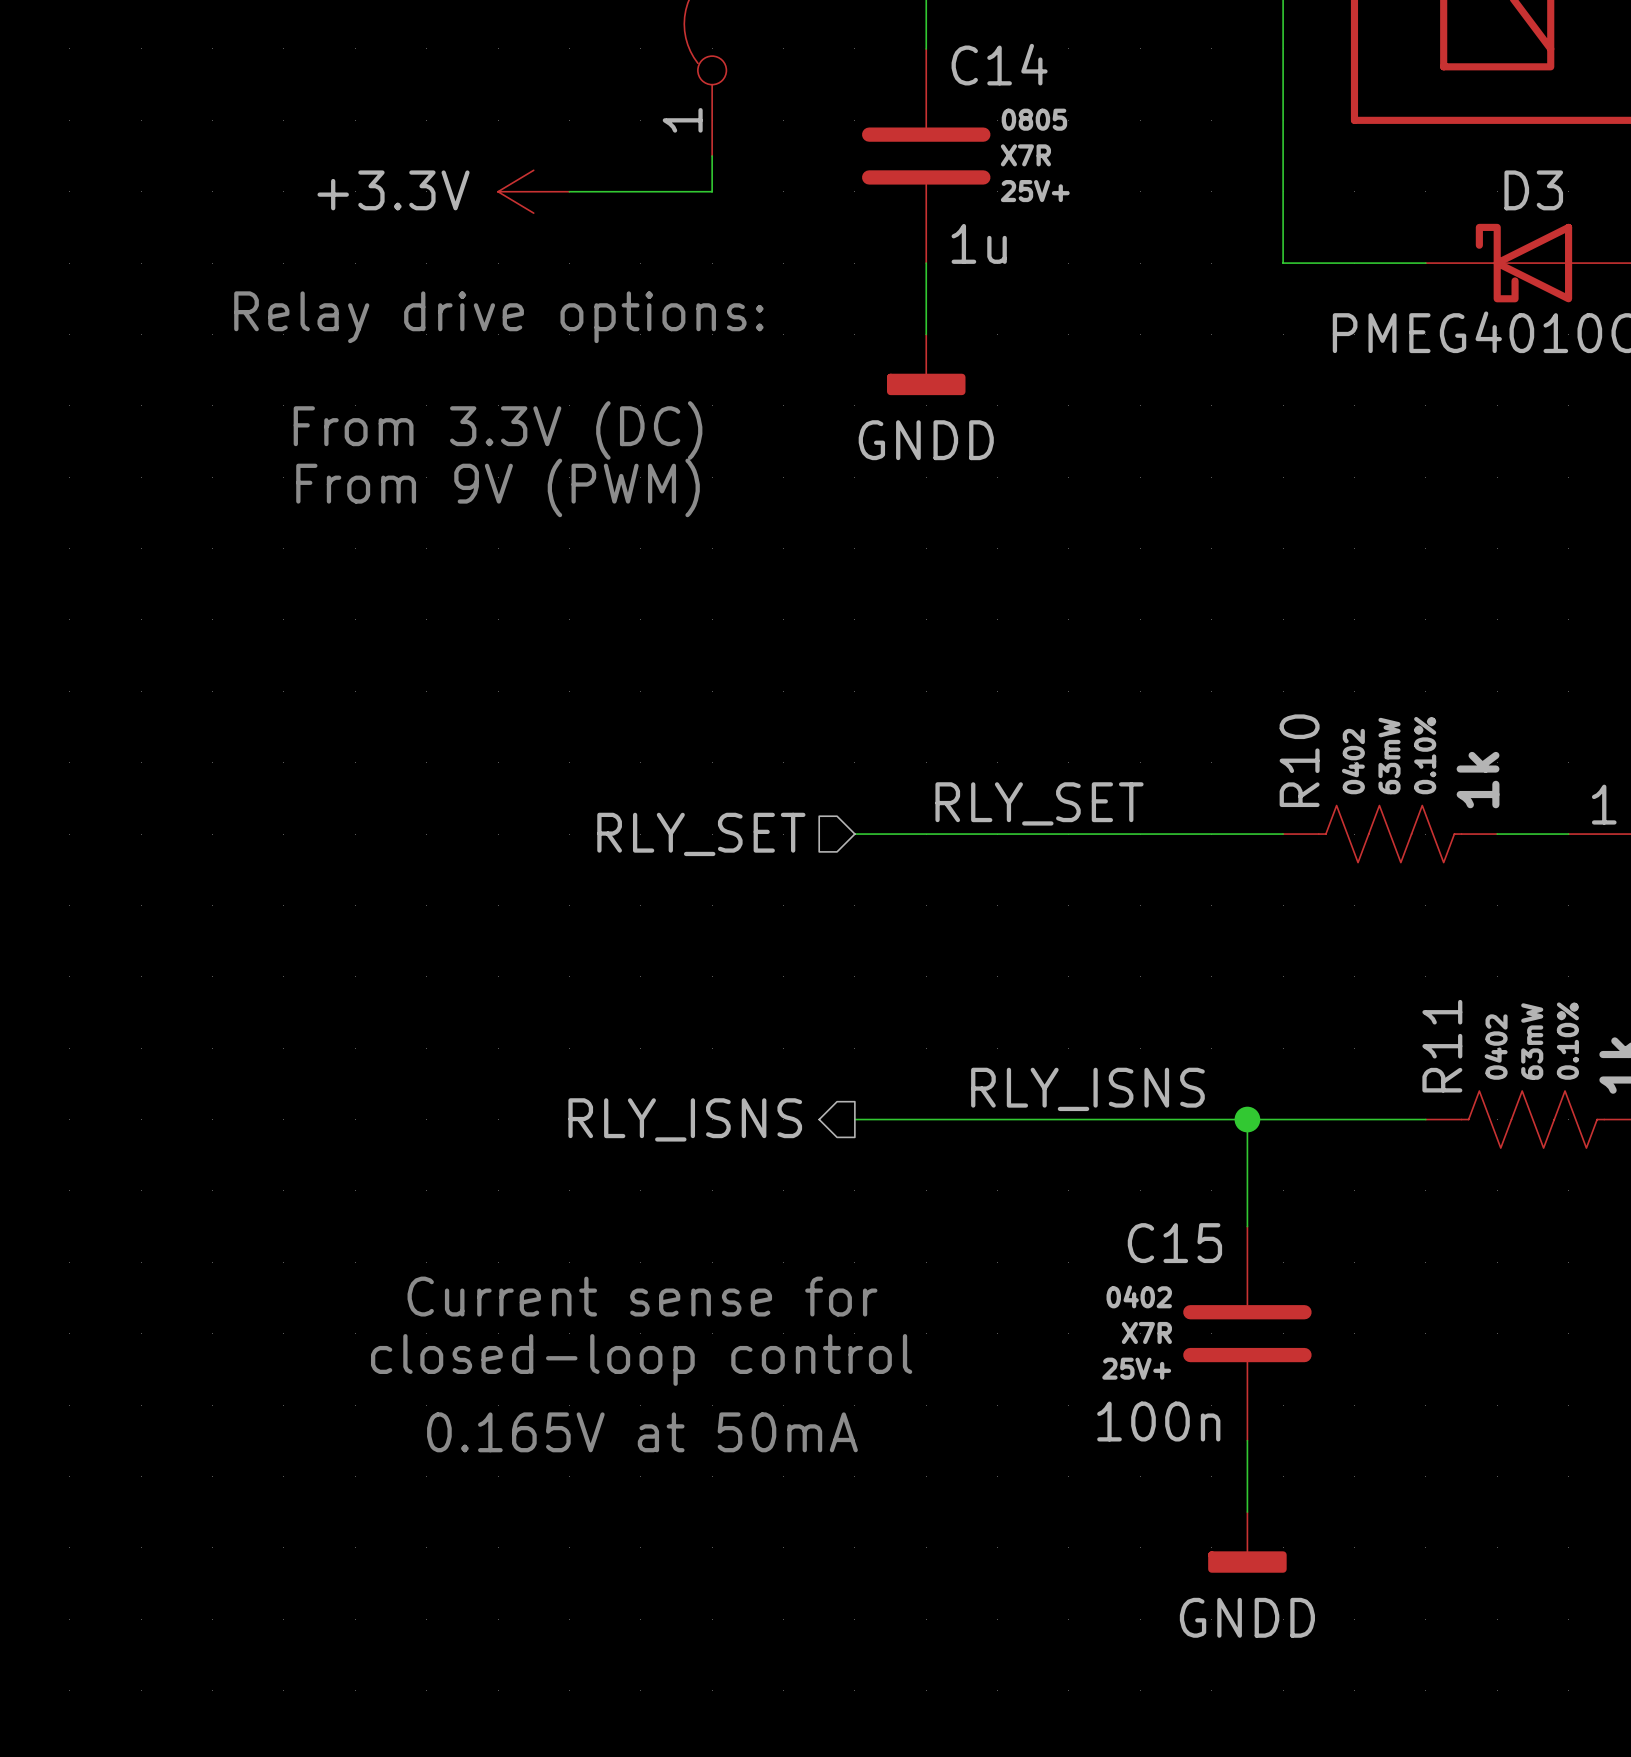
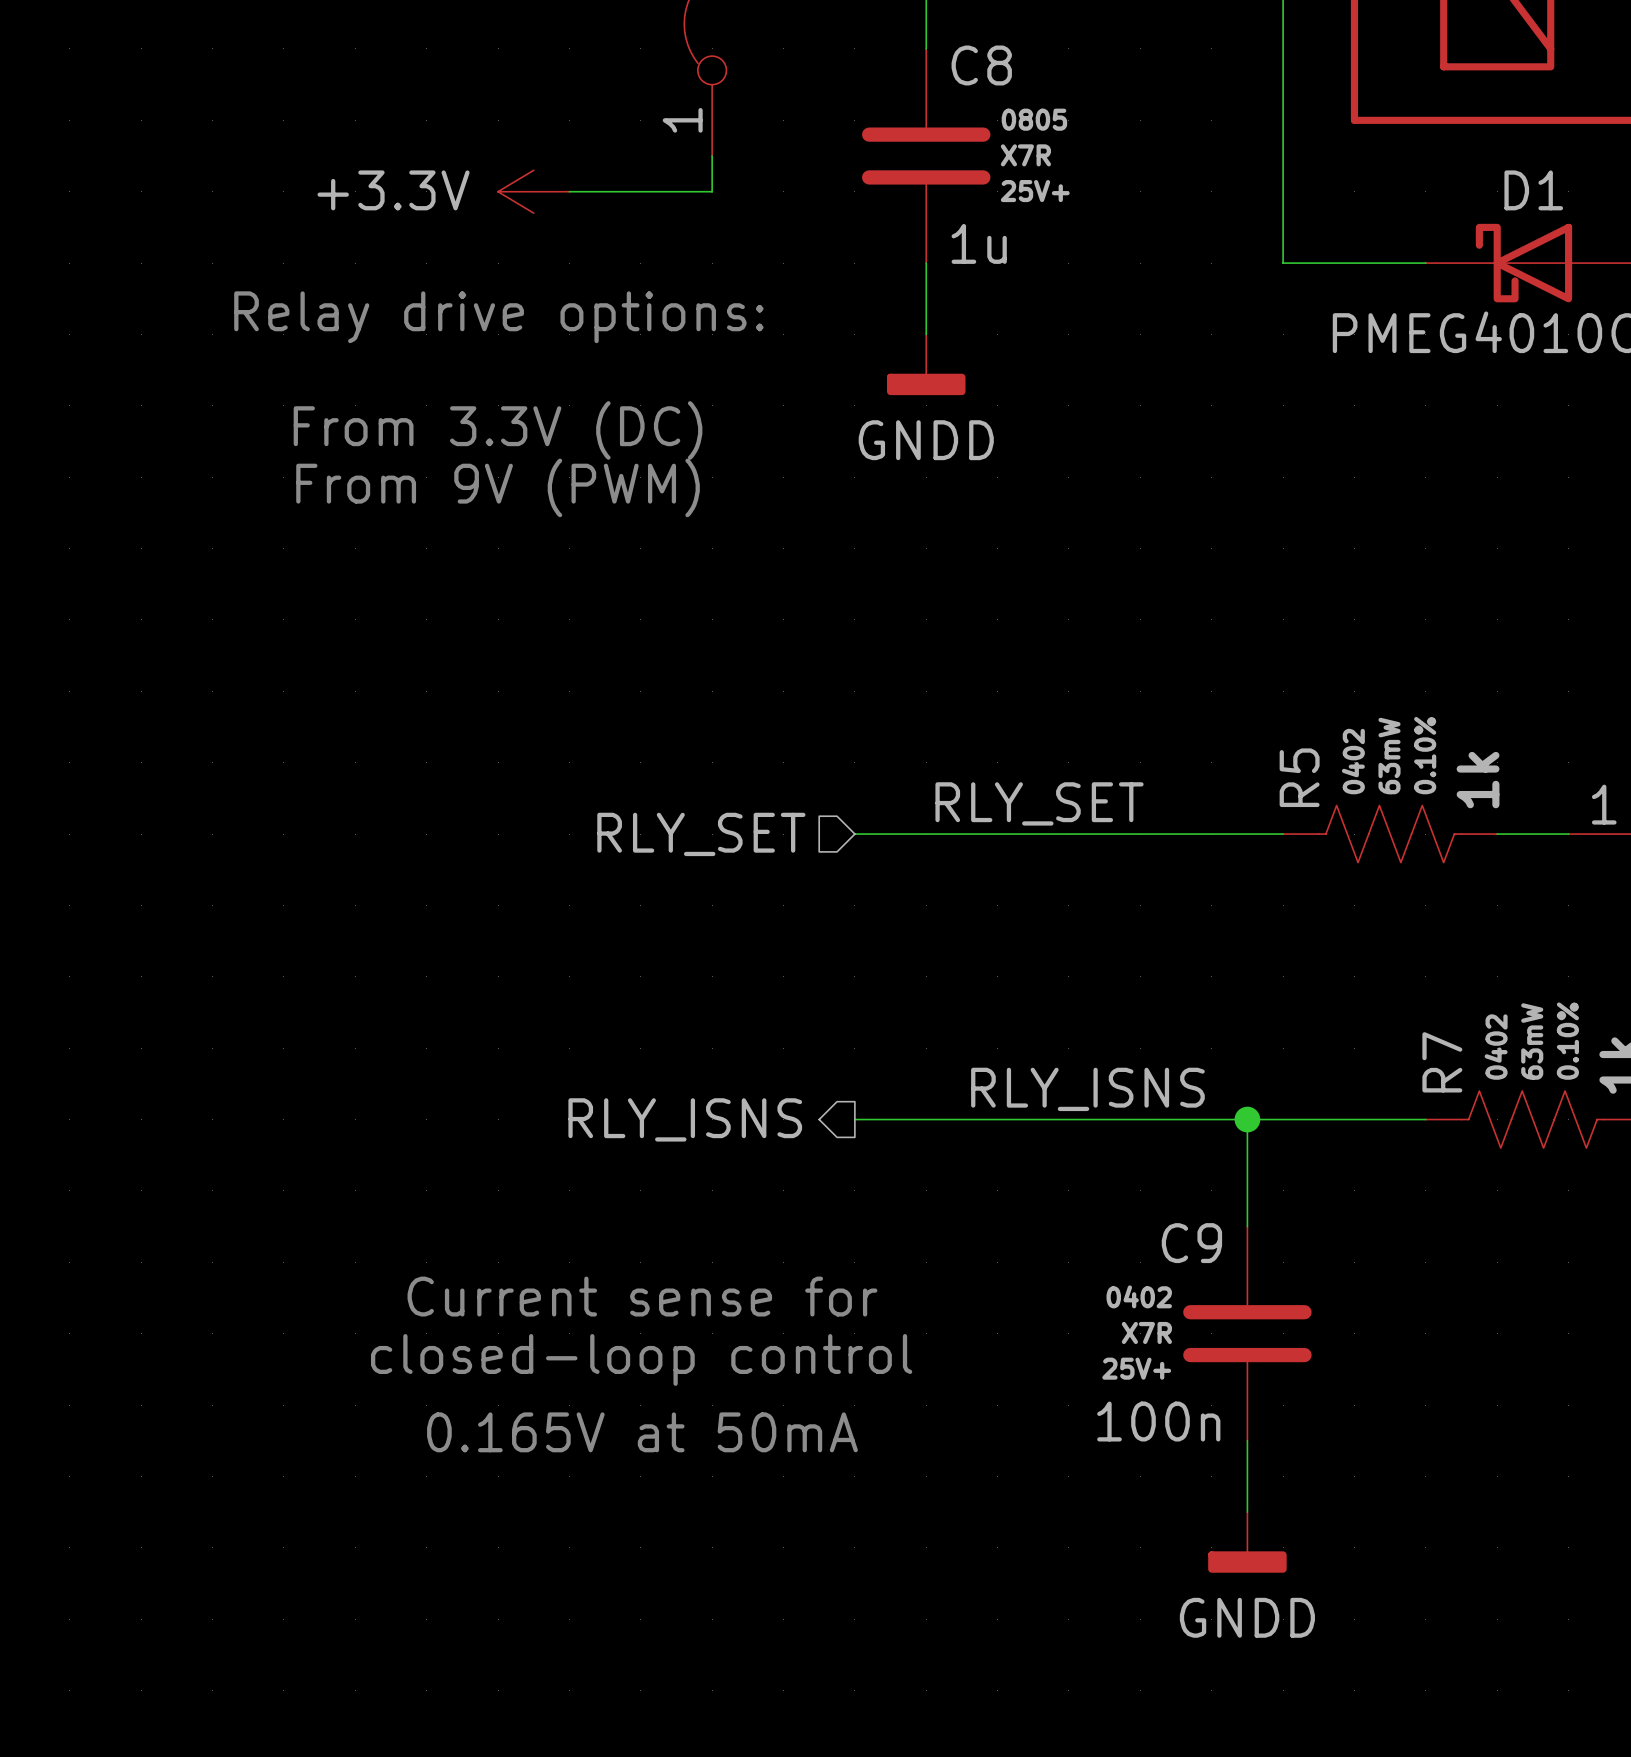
C14 name: C14 (999, 64) -> C8 (981, 65)
D3 name: D3 (1533, 190) -> D1 (1533, 190)
R10 name: R10 (1299, 760) -> R5 (1299, 777)
R11 name: R11 (1442, 1046) -> R7 (1442, 1062)
C15 name: C15 (1174, 1243) -> C9 (1191, 1243)

